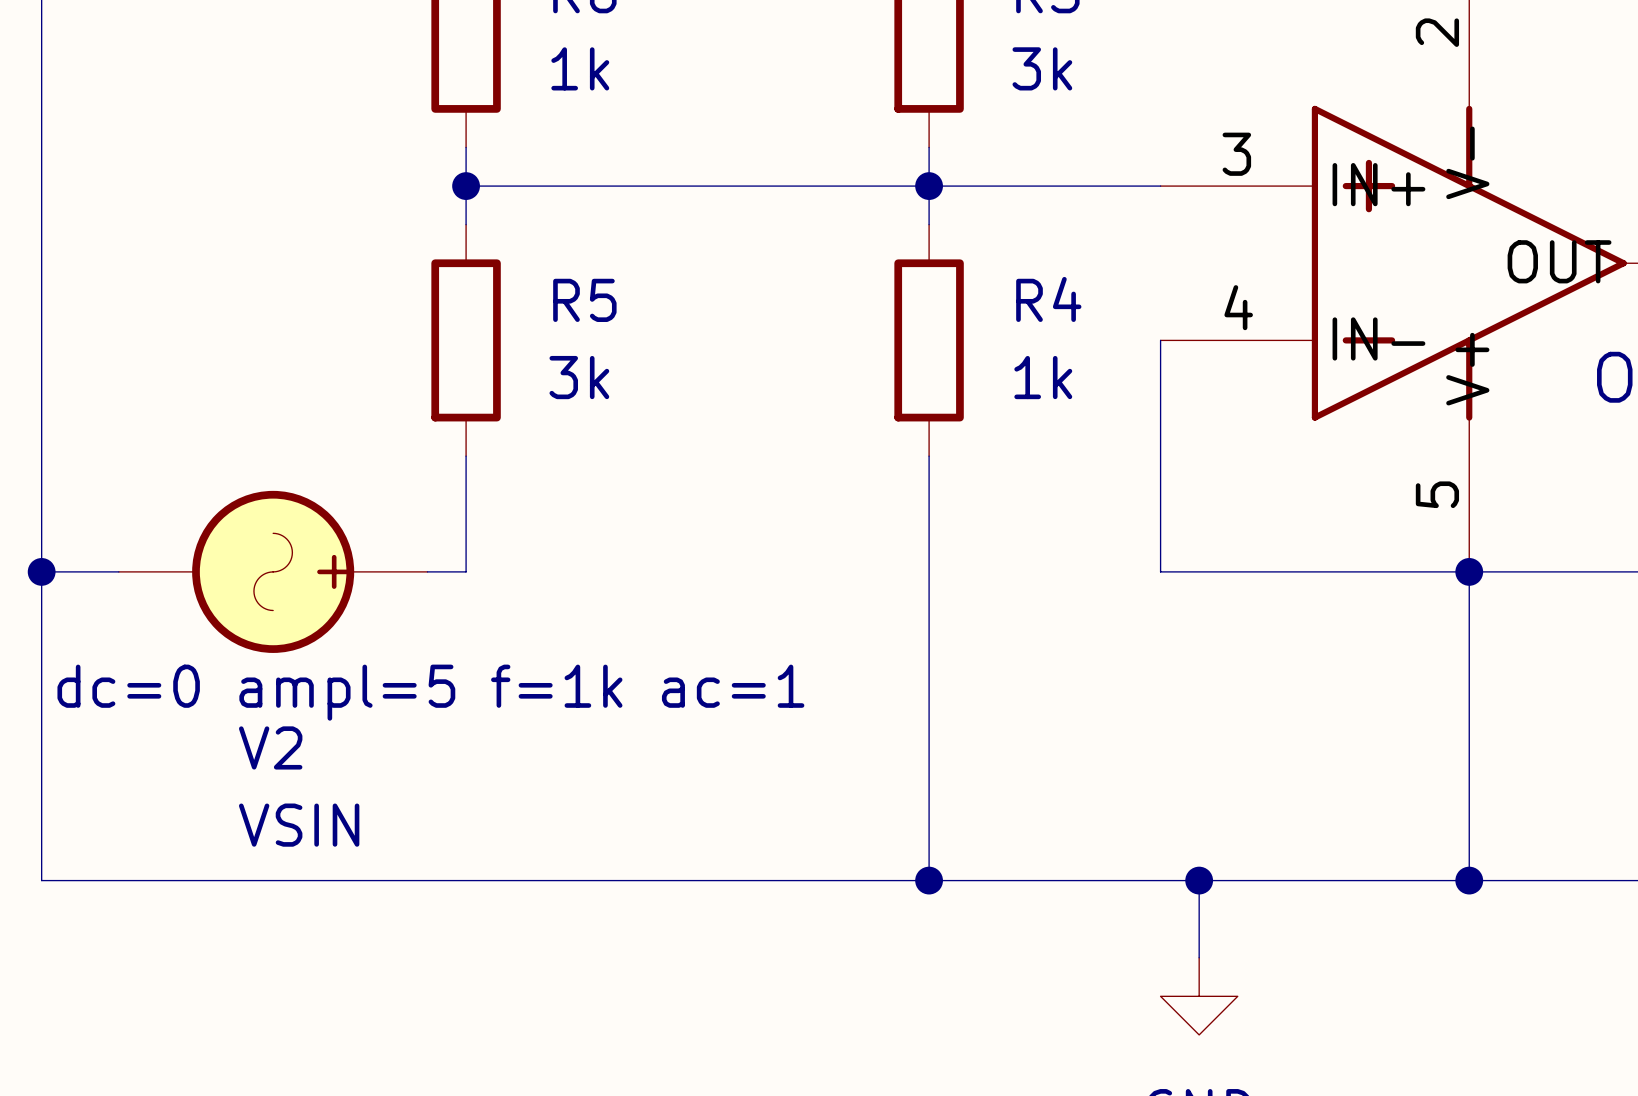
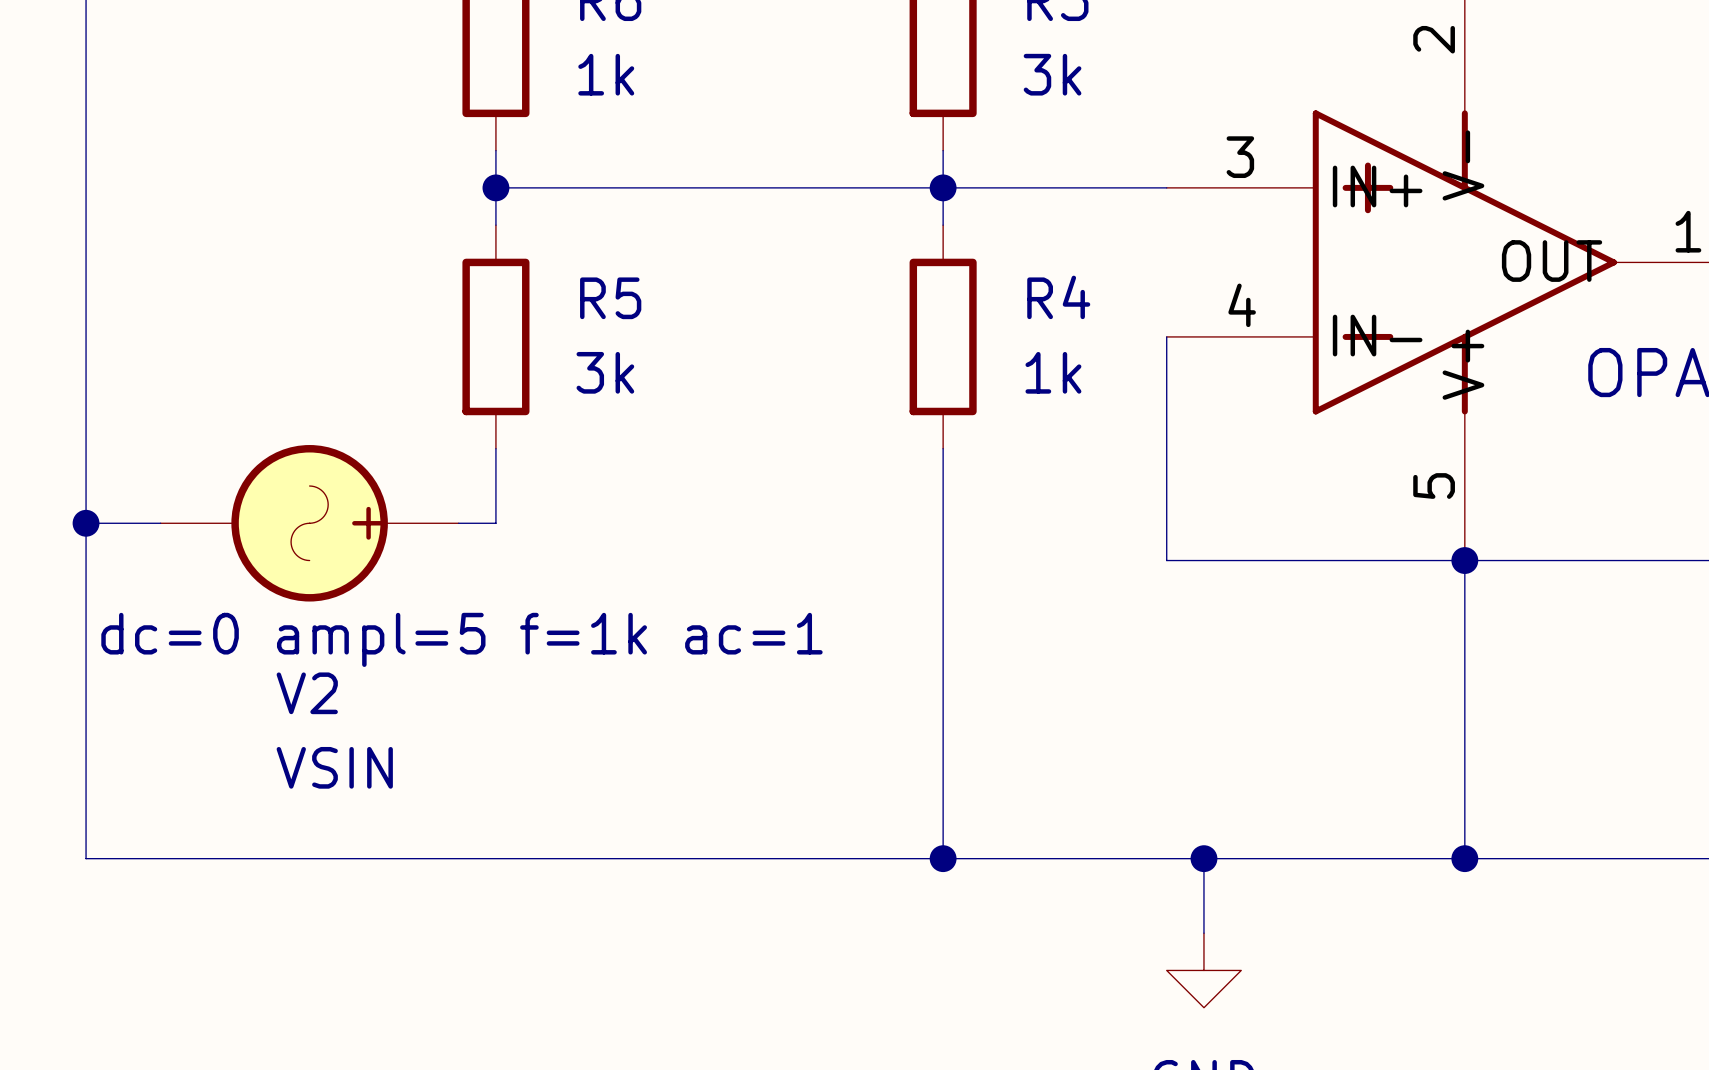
wire: (466, 533) (466, 571) (427, 571) -> (495, 523) (458, 523)
wire: (41, 571) (118, 571) -> (86, 523) (160, 523)
junction position: (41, 571) -> (86, 523)
V2 position: (273, 571) -> (309, 523)

